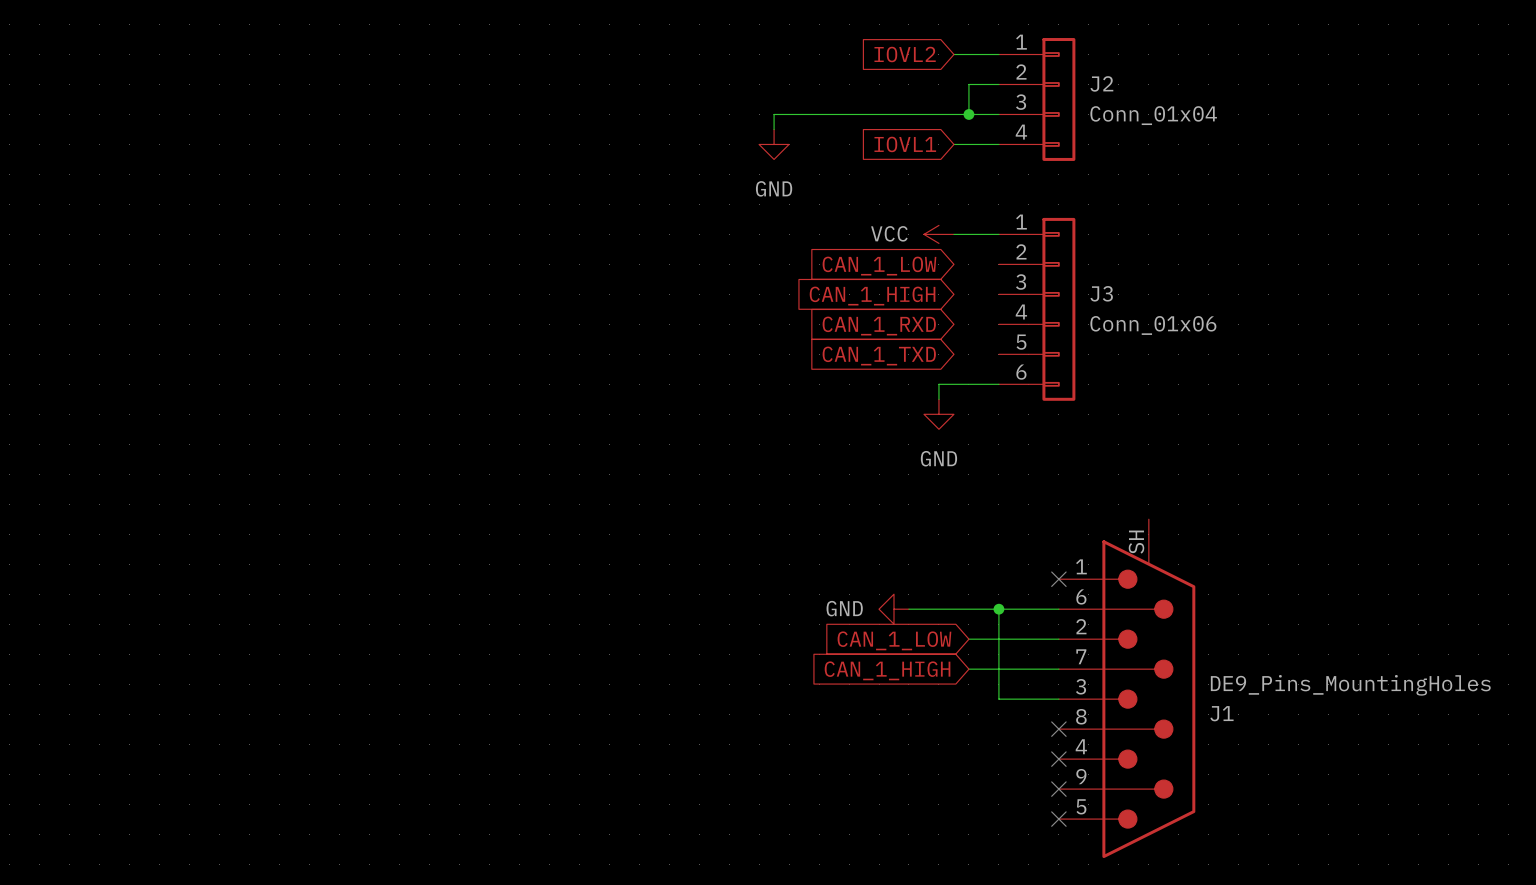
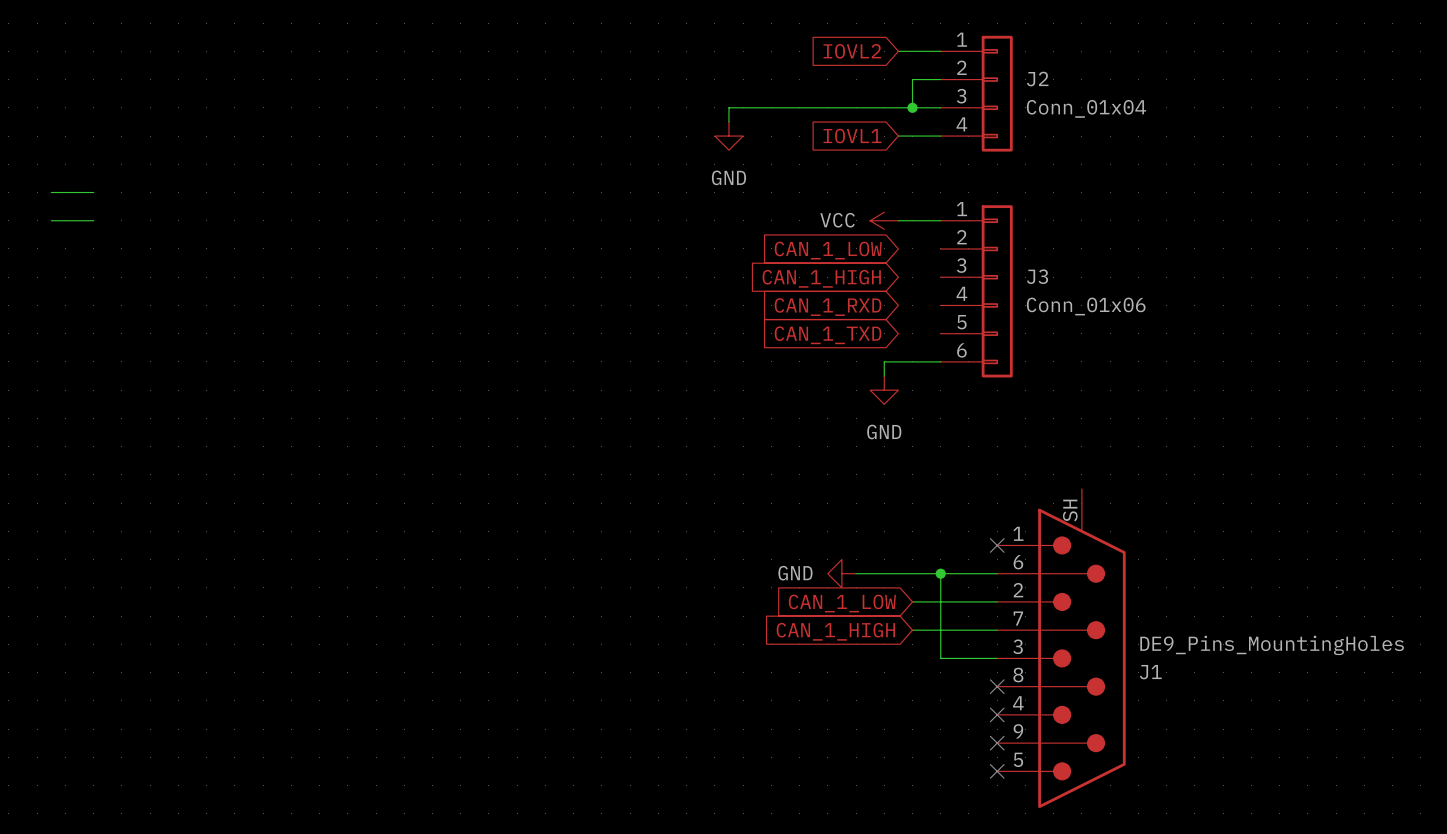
wire: none -> (51, 192) (93, 192)
wire: none -> (51, 220) (93, 220)

